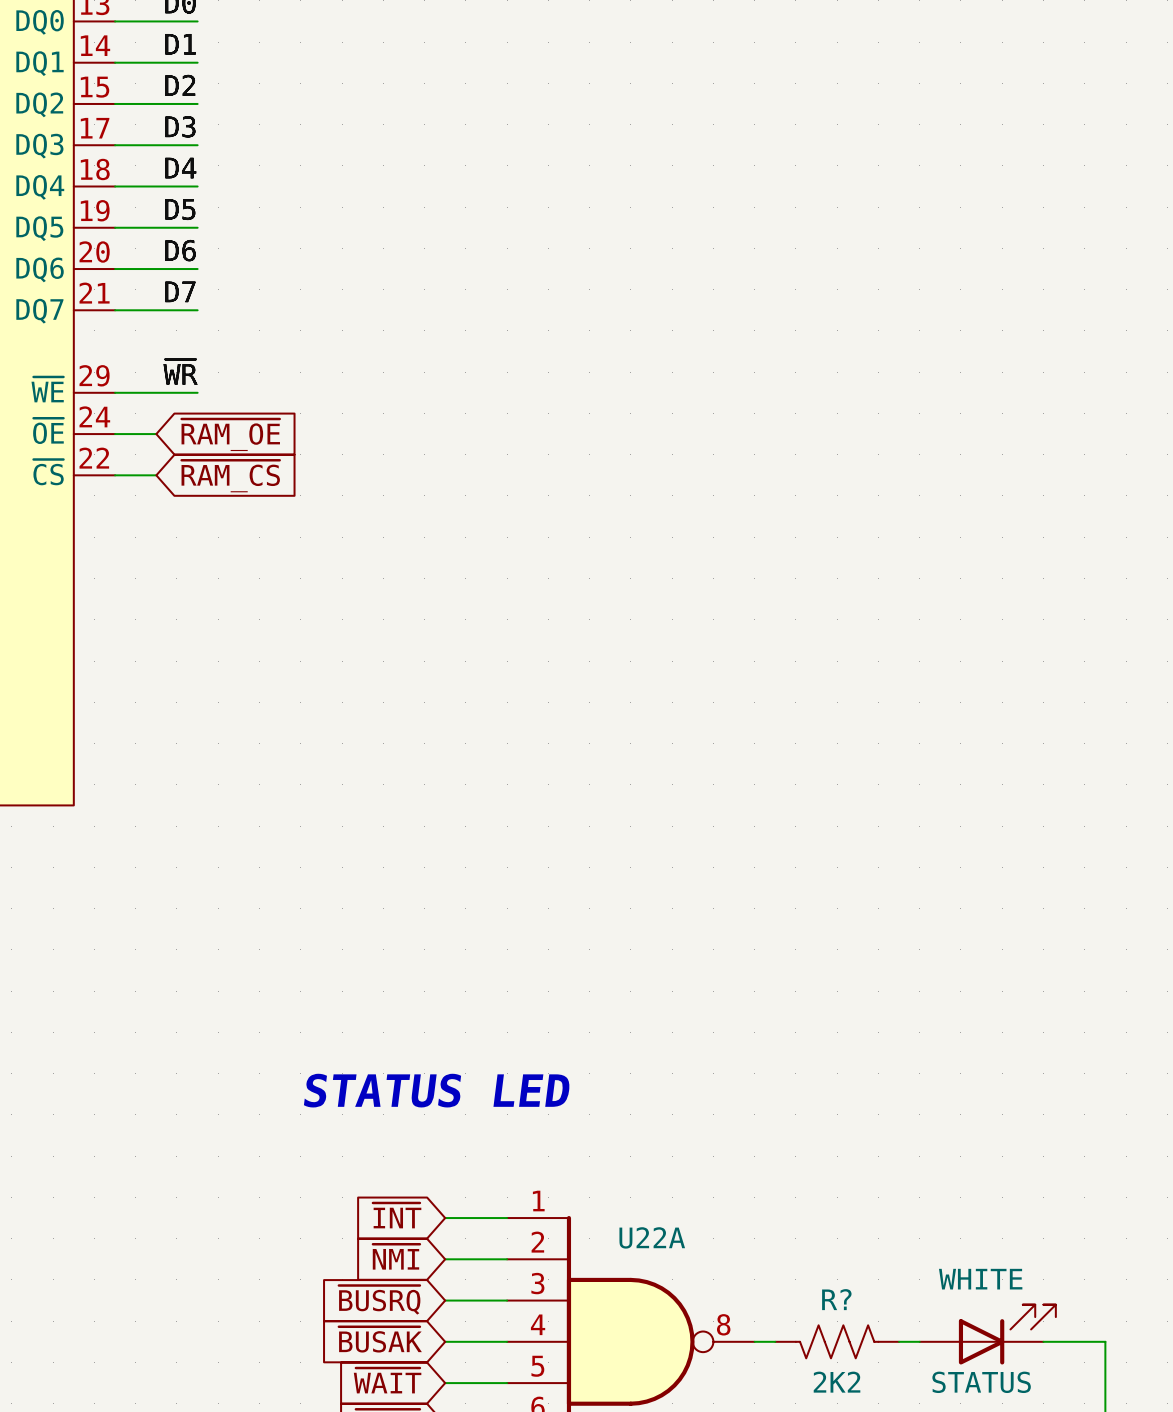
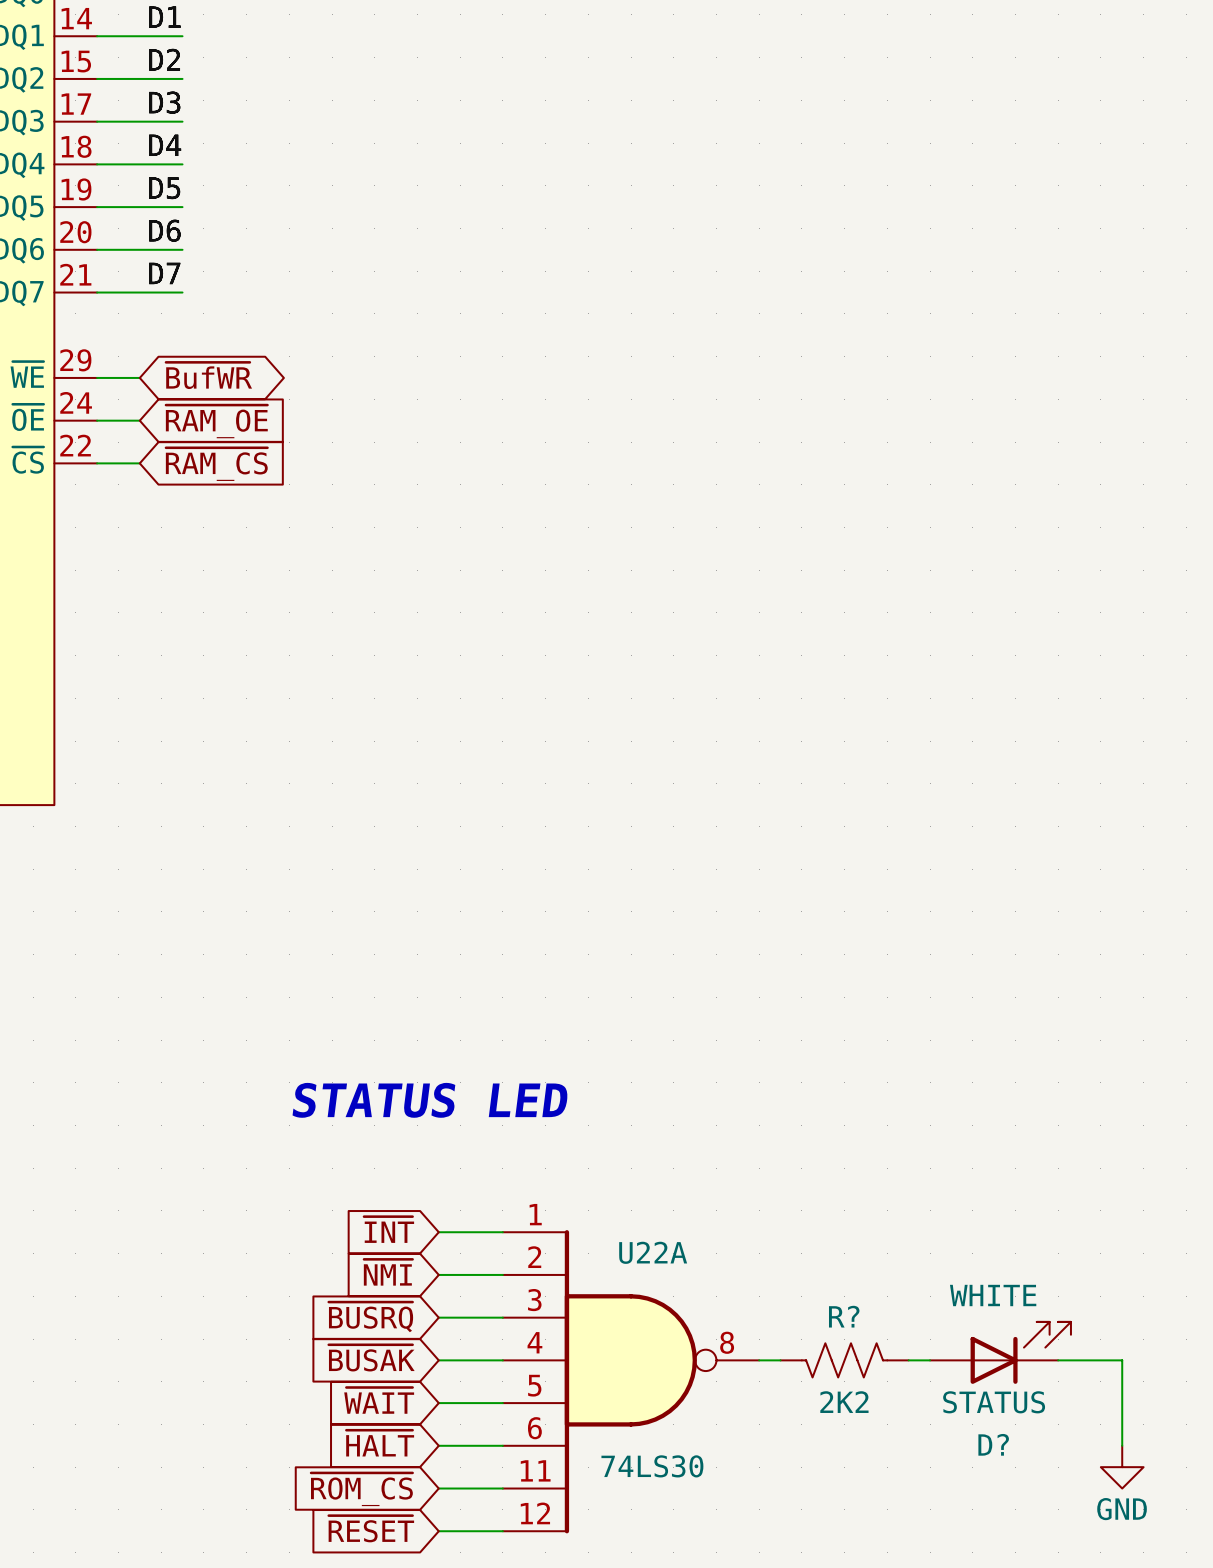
label: ~{WR} (180, 372) -> none
global label: none -> ~{BufWR} (208, 375)
wire: (156, 392) (197, 392) -> none

